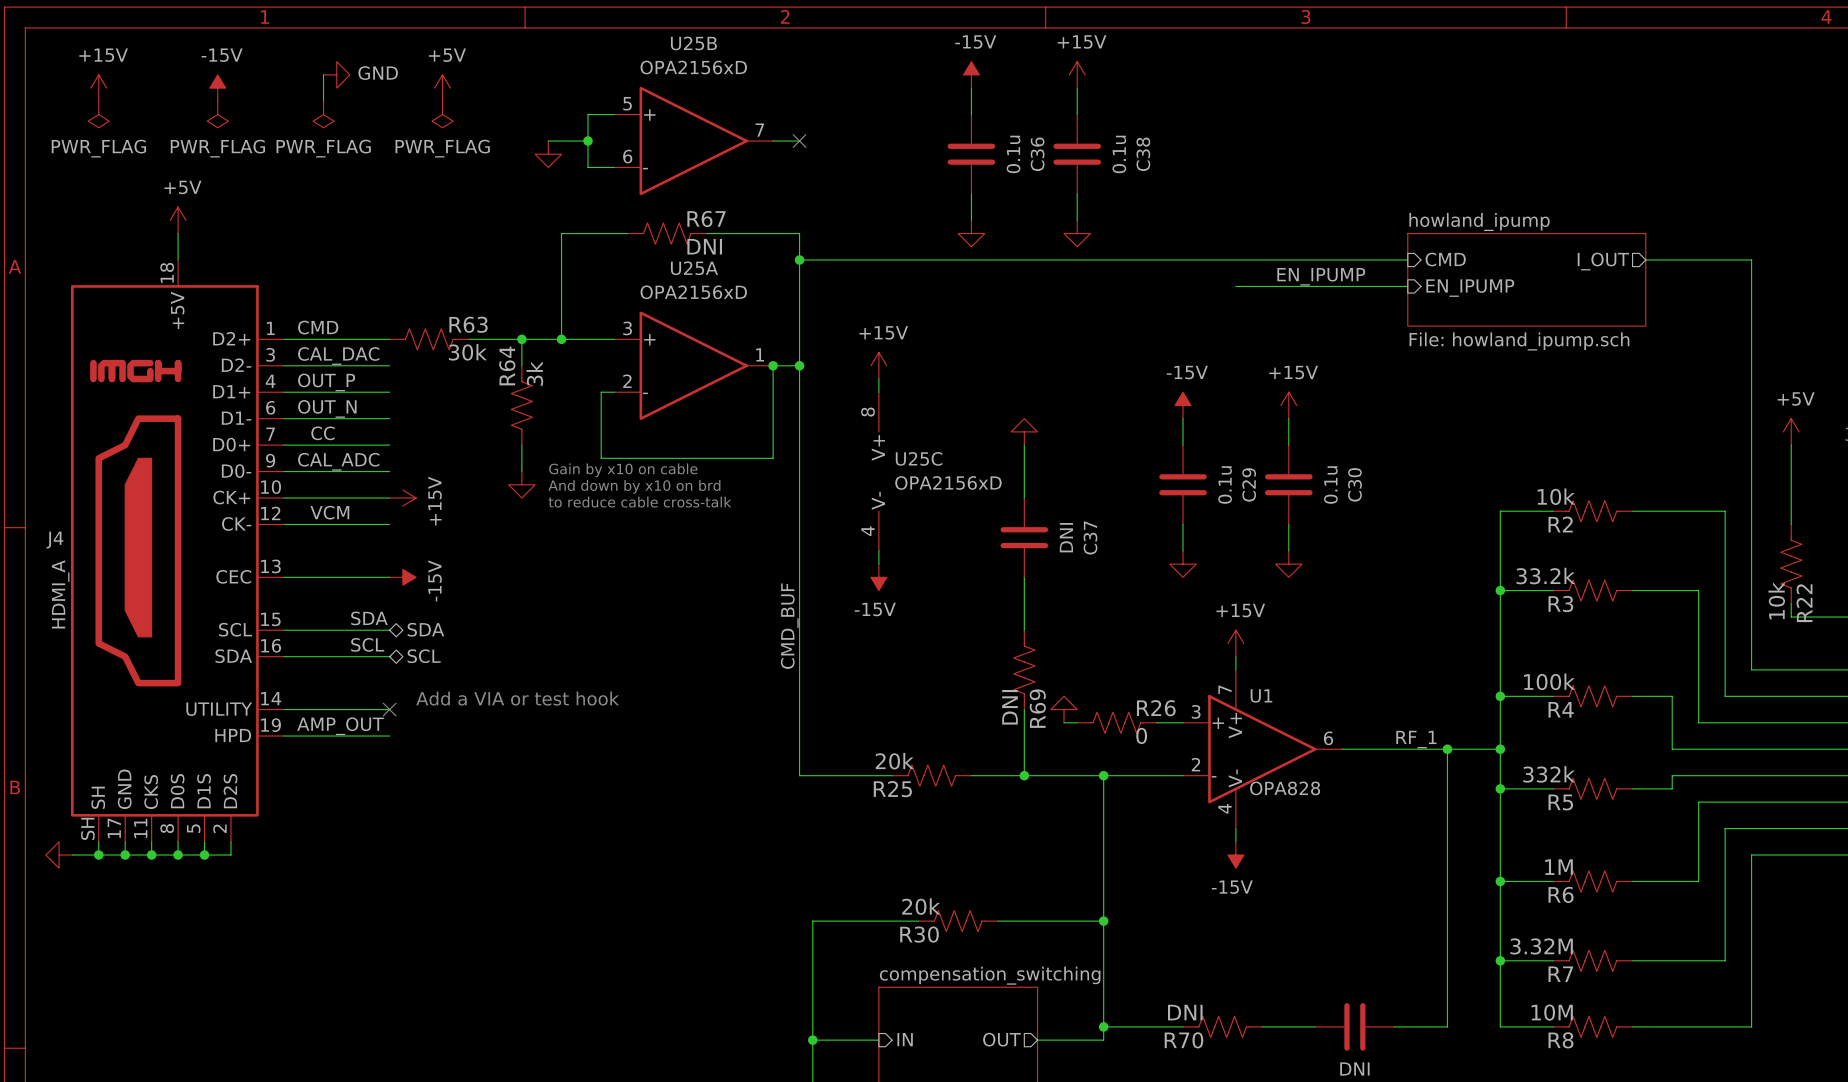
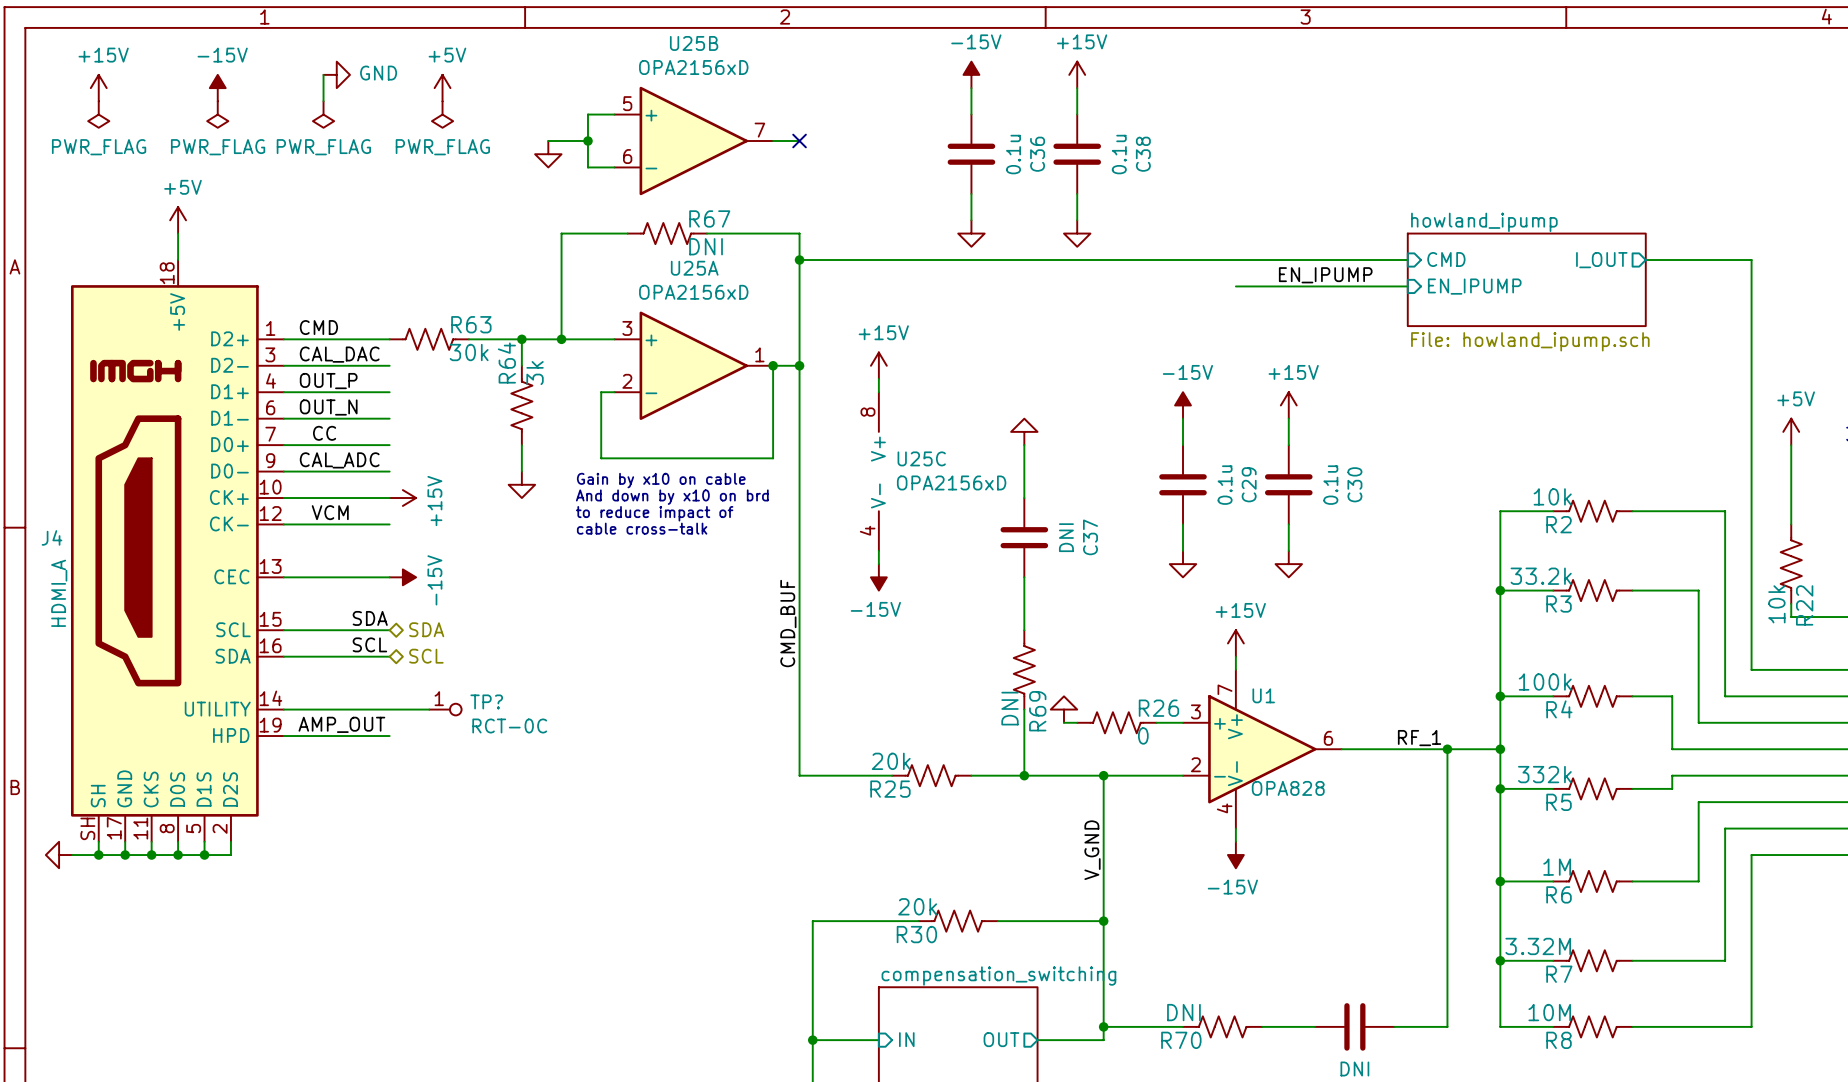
text position: Gain by x10 on cable (623, 470) -> Gain by x10 on cable (661, 480)
text position: And down by x10 on brd (634, 486) -> And down by x10 on brd (672, 497)
text: to reduce cable cross-talk (640, 502) -> none
text: none -> to reduce impact of (654, 513)
text: none -> cable cross-talk (642, 528)
text: Add a VIA or test hook (517, 698) -> none
wire: none -> (389, 709) (429, 709)
no-connect mark: (389, 709) -> none
TP?: none -> RCT-0C (445, 709)
label: none -> V_GND (1092, 850)

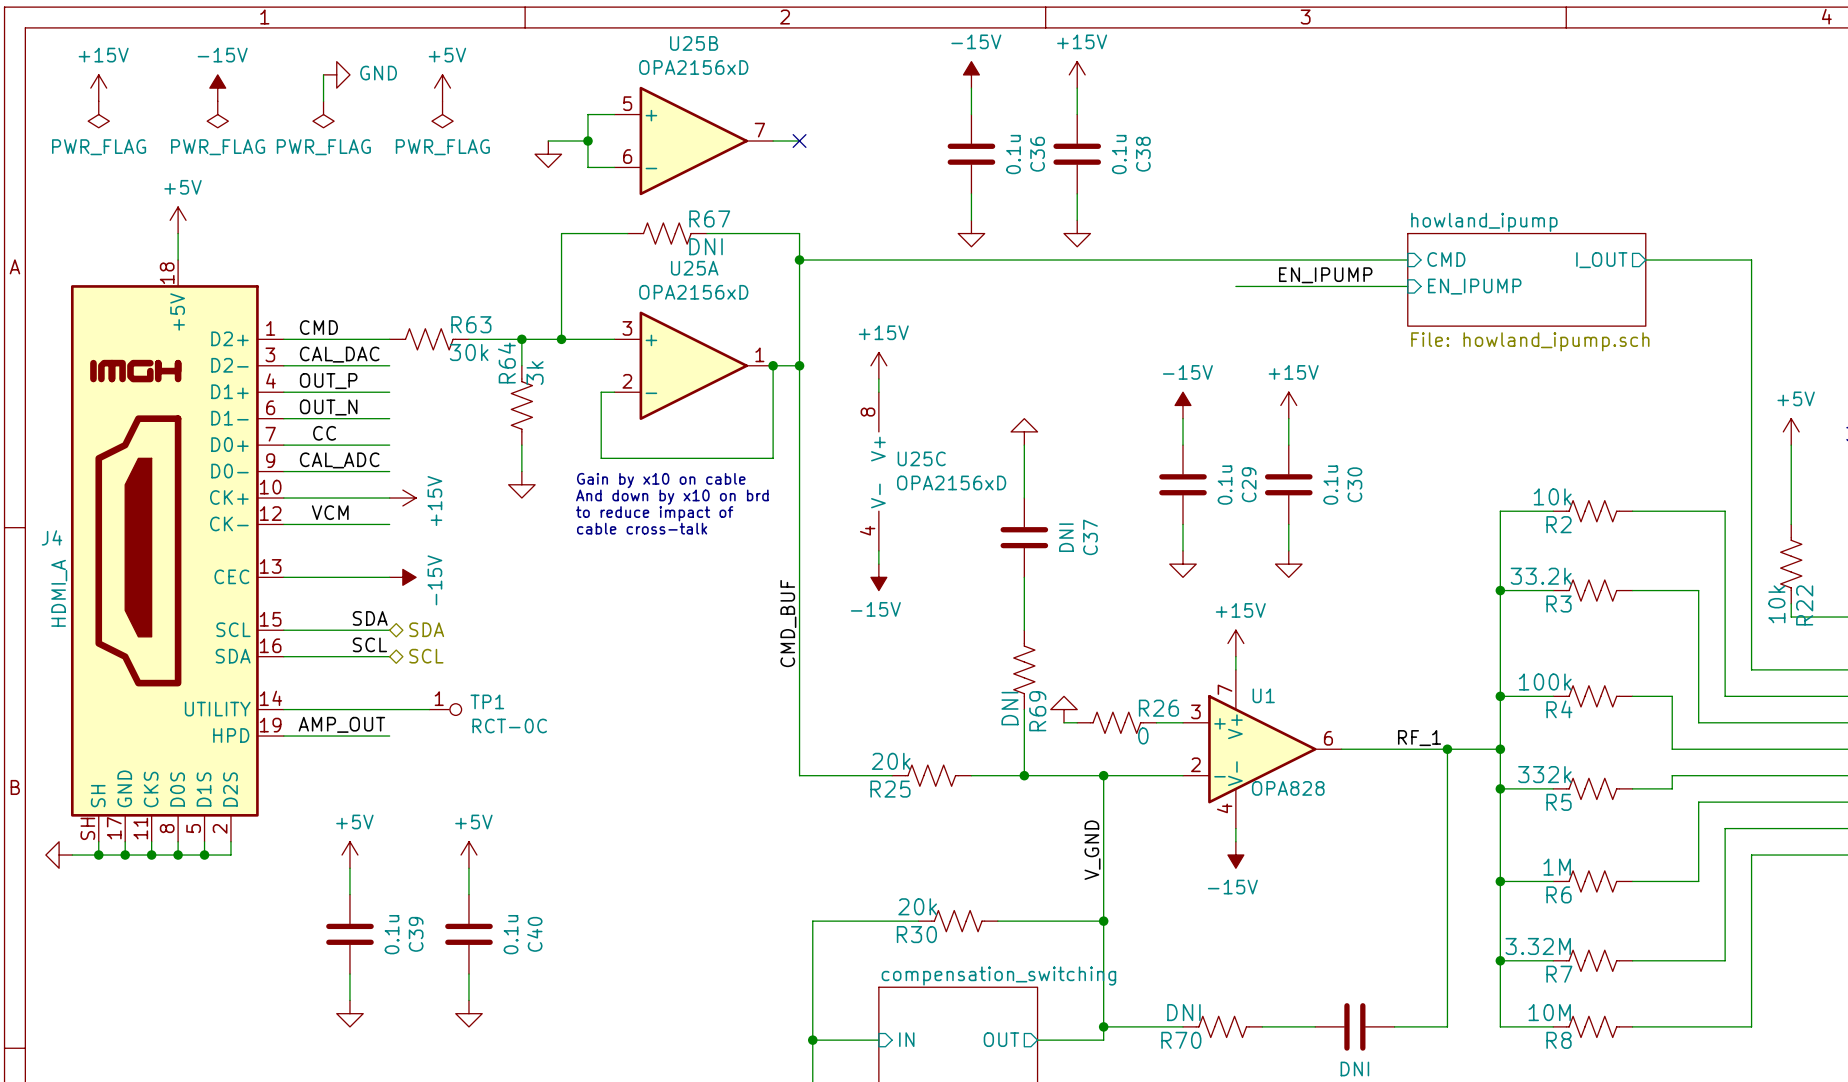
TP? name: TP? (486, 701) -> TP1 (487, 701)
power symbol: none -> +5V (349, 855)
power symbol: none -> +5V (468, 855)
wire: none -> (349, 868) (349, 894)
wire: none -> (468, 868) (468, 894)
C39: none -> 0.1u (349, 934)
C40: none -> 0.1u (468, 934)
wire: none -> (349, 974) (349, 1000)
wire: none -> (468, 974) (468, 1000)
power symbol: none -> (349, 1013)
power symbol: none -> (468, 1013)

